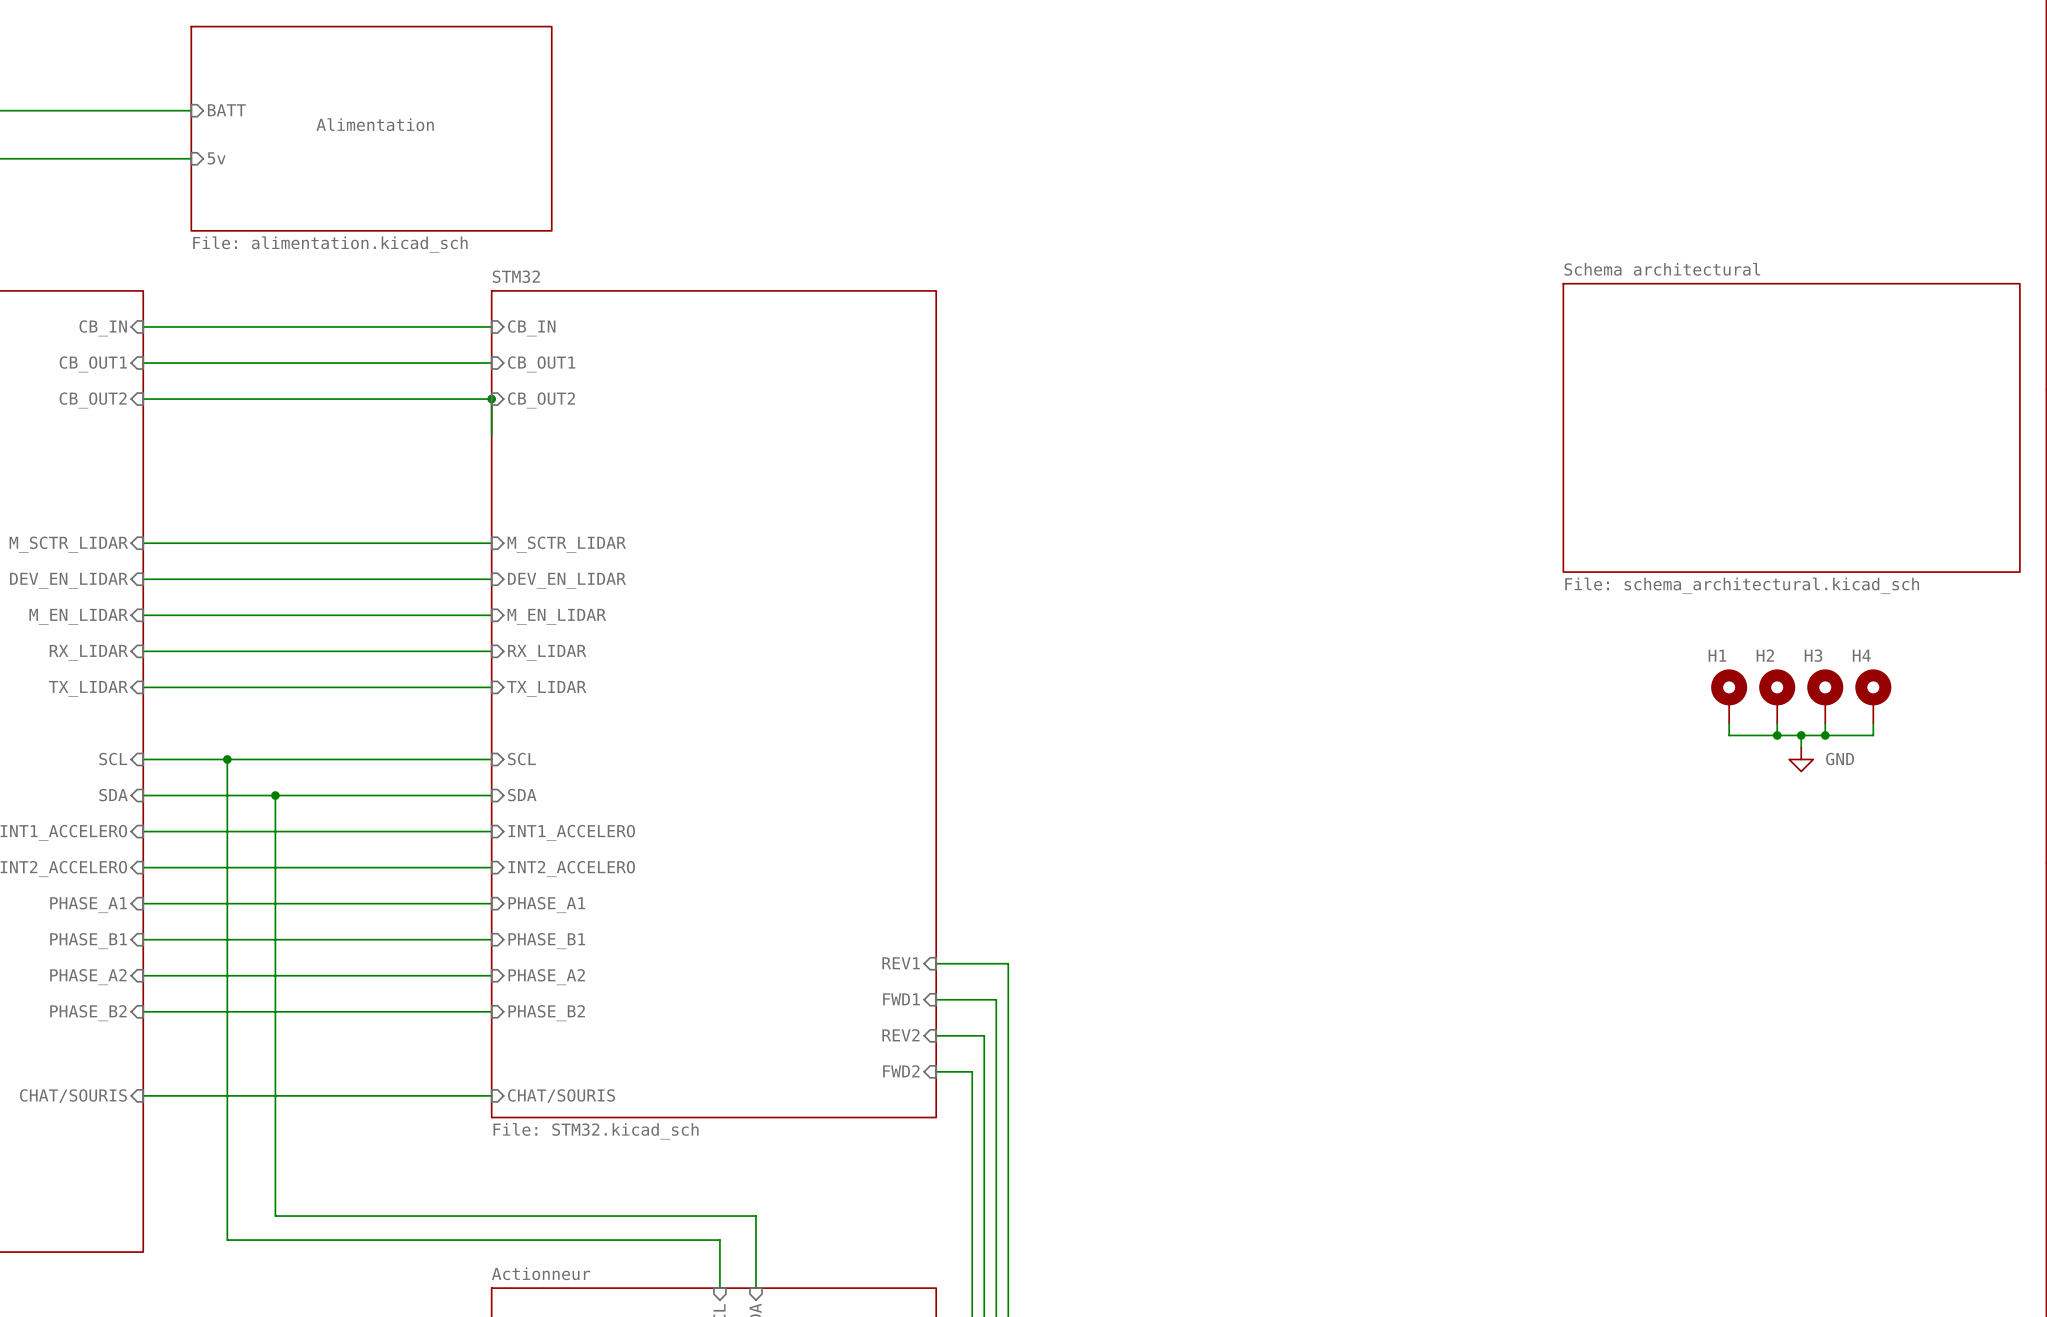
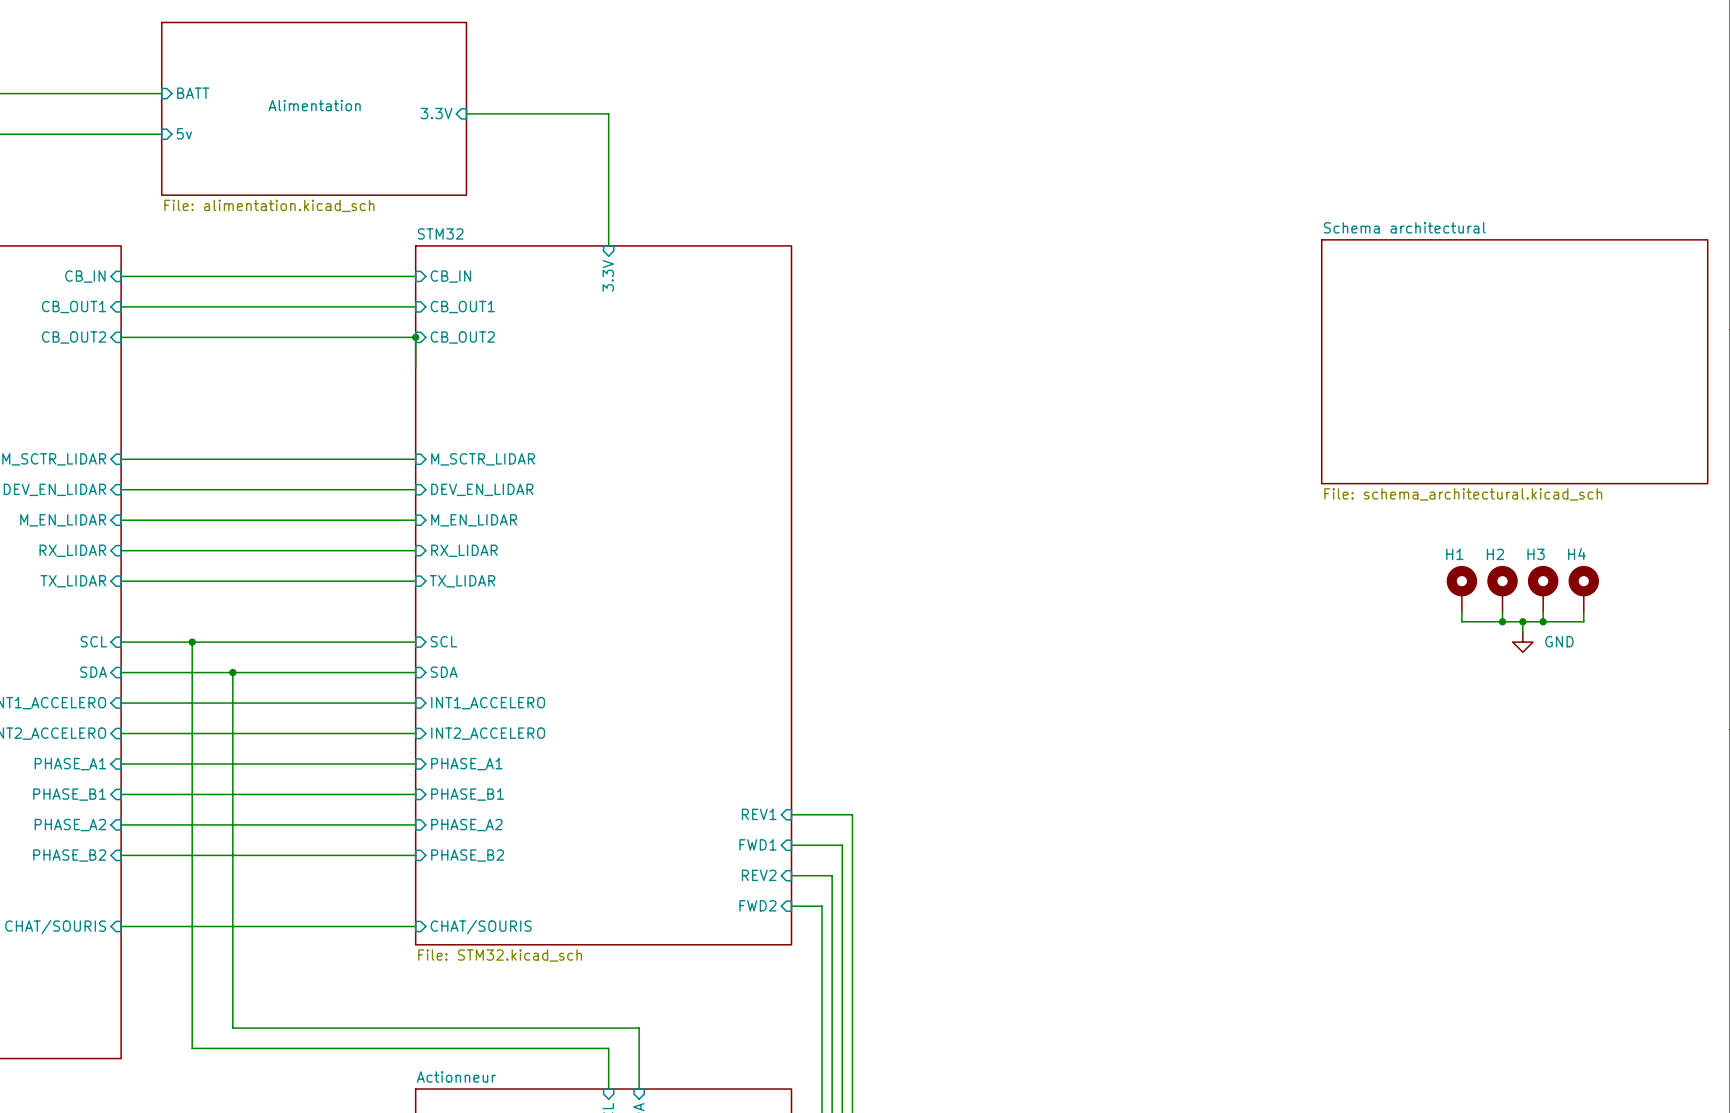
sheet pin: none -> 3.3V (436, 113)
wire: none -> (466, 113) (608, 113) (608, 245)
sheet pin: none -> 3.3V (608, 275)

